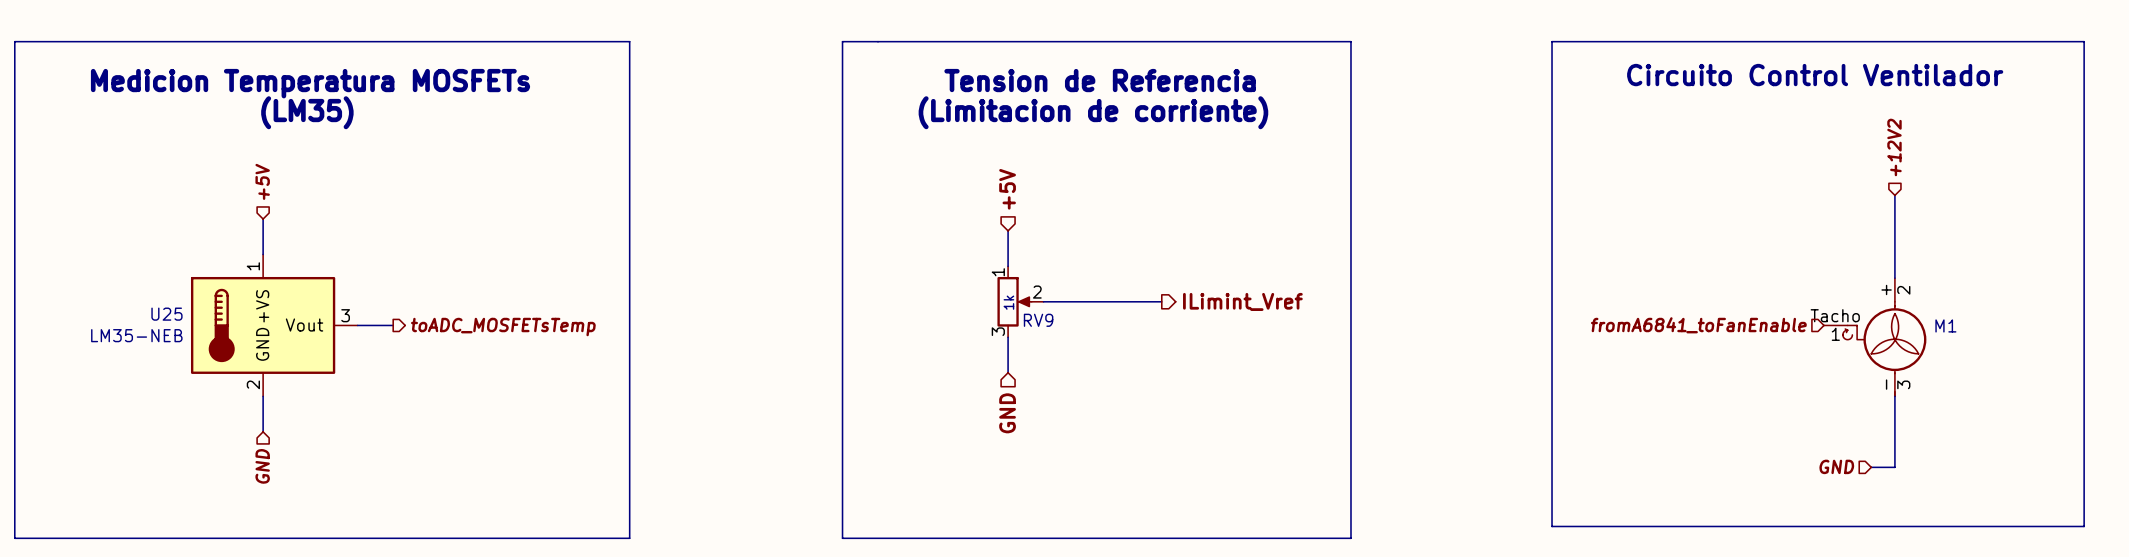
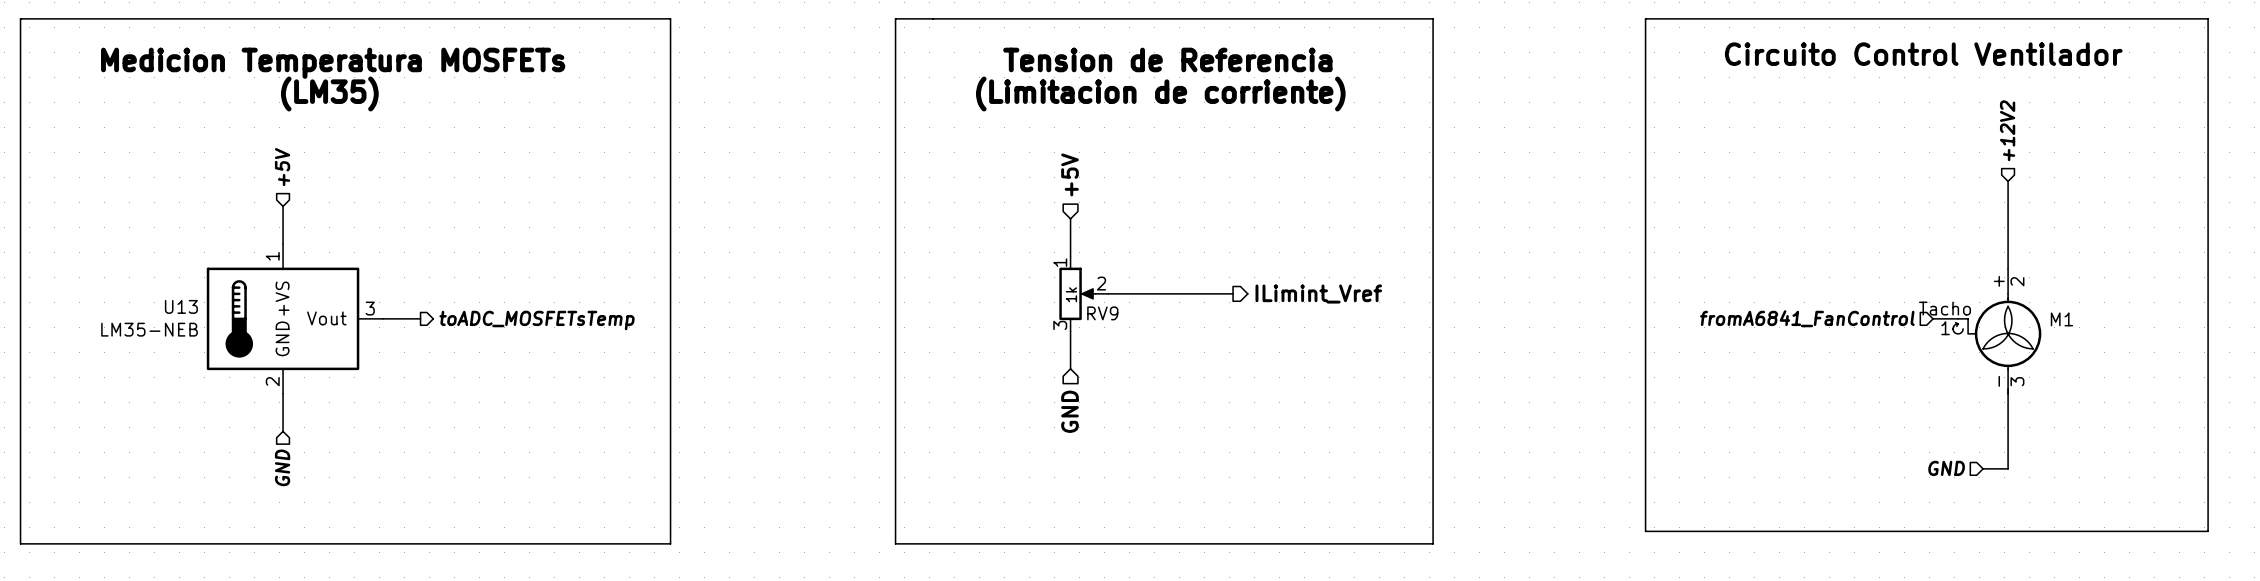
U25 name: U25 (166, 314) -> U13 (181, 306)
hierarchical label: fromA6841_toFanEnable (1698, 325) -> fromA6841_FanControl (1807, 318)

